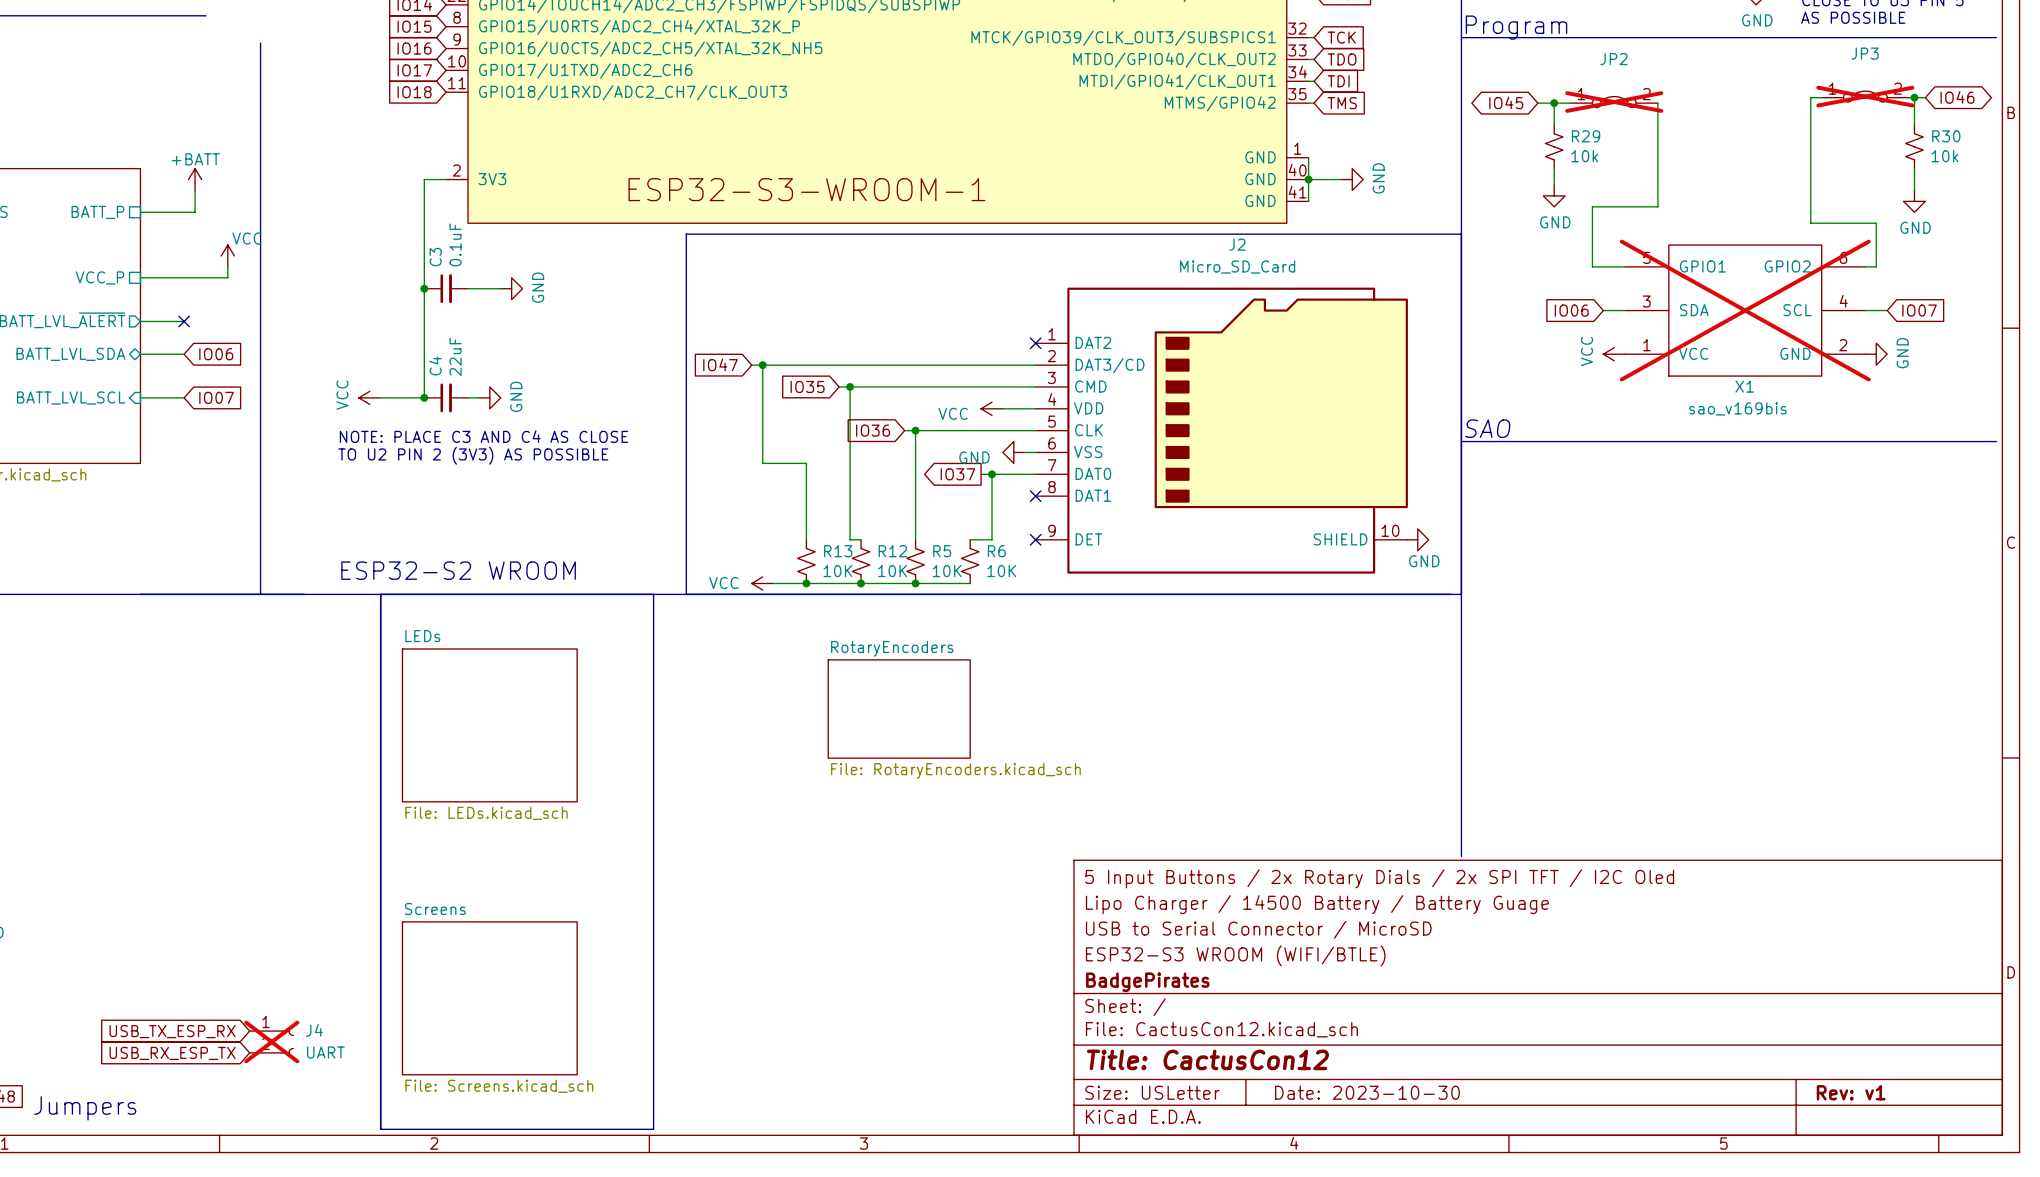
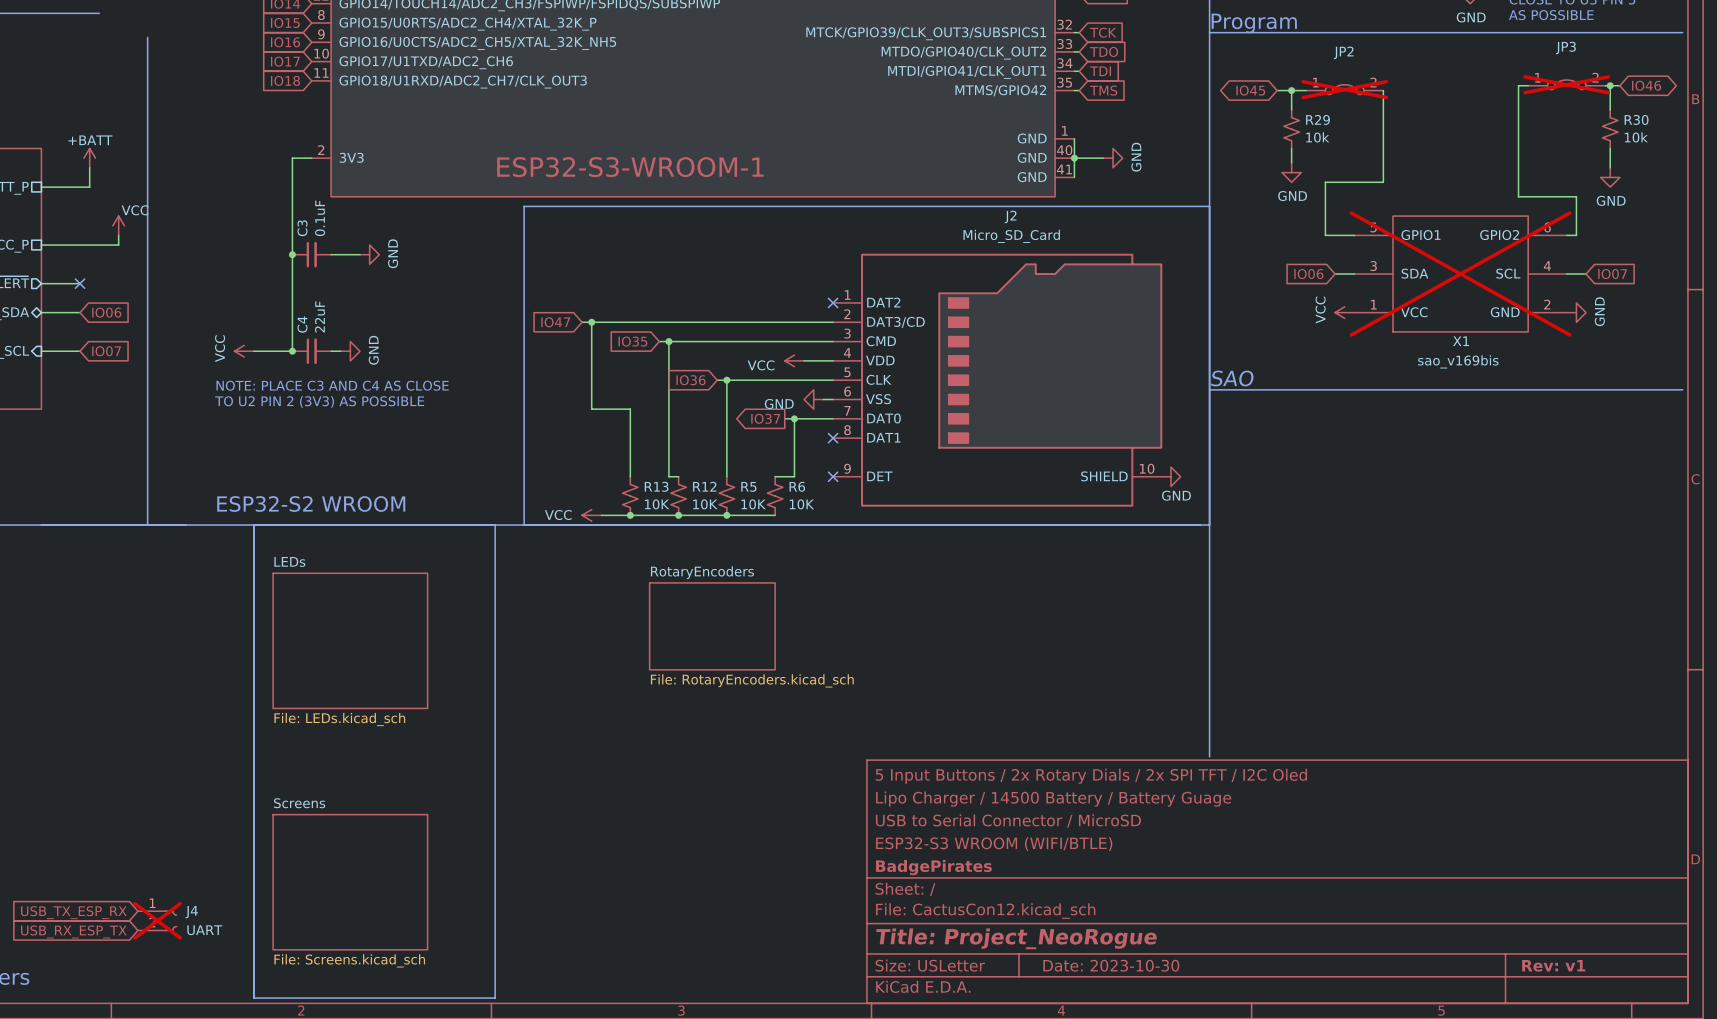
title block: Title: CactusCon12 (1207, 1059) -> Title: Project_NeoRogue (1016, 938)

